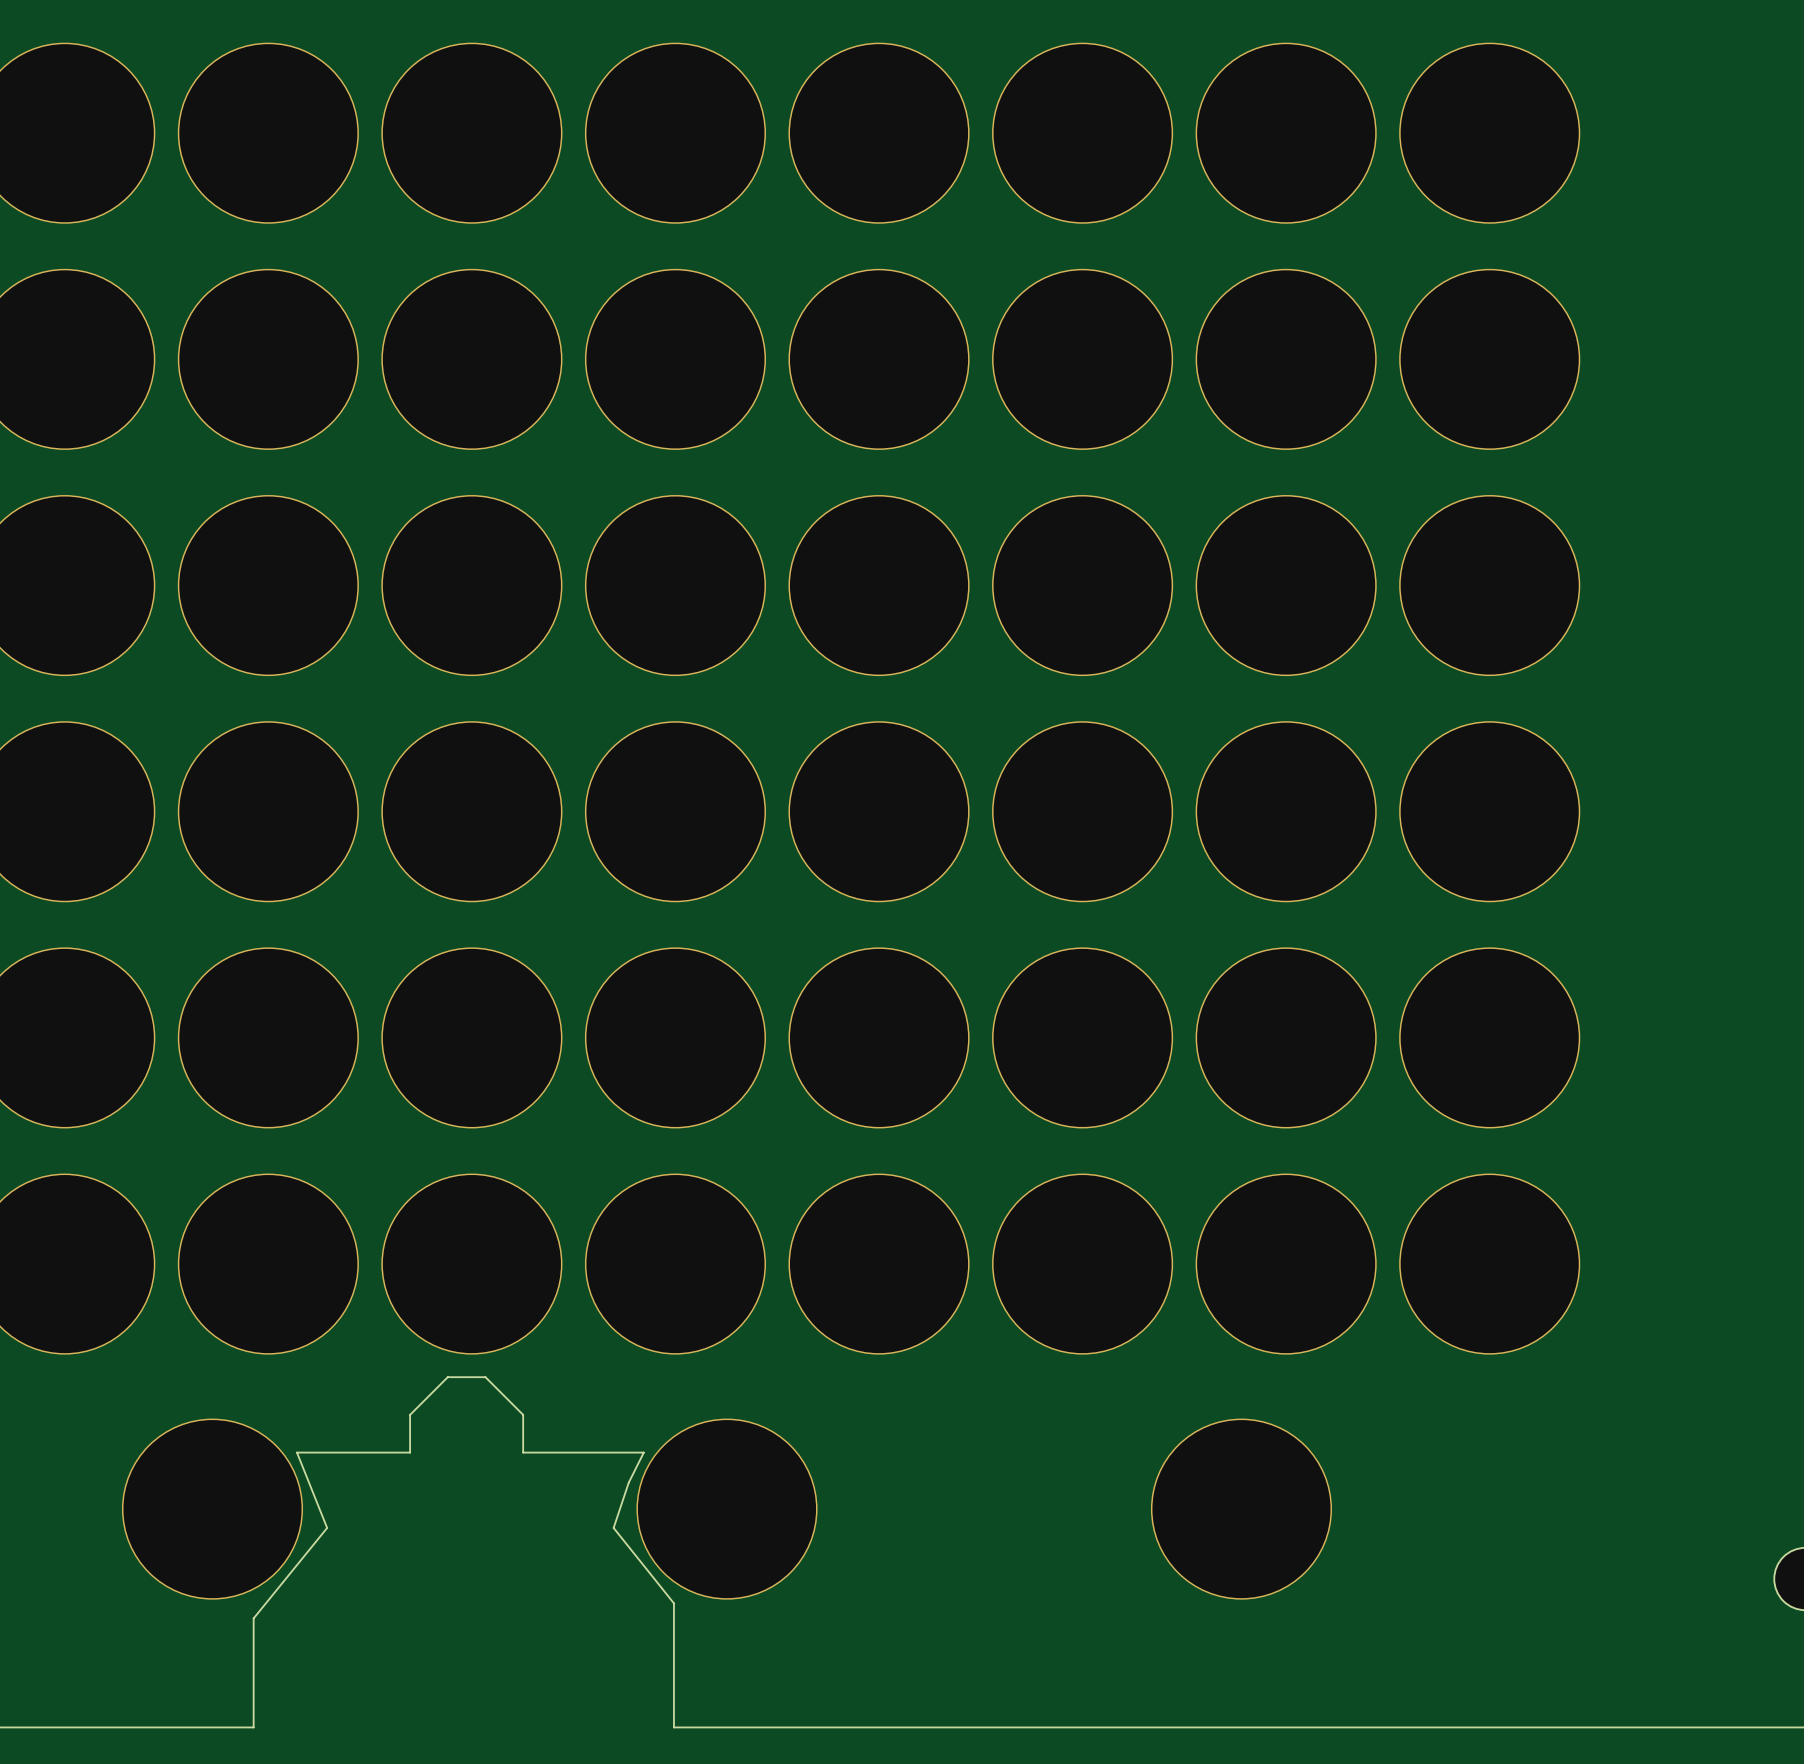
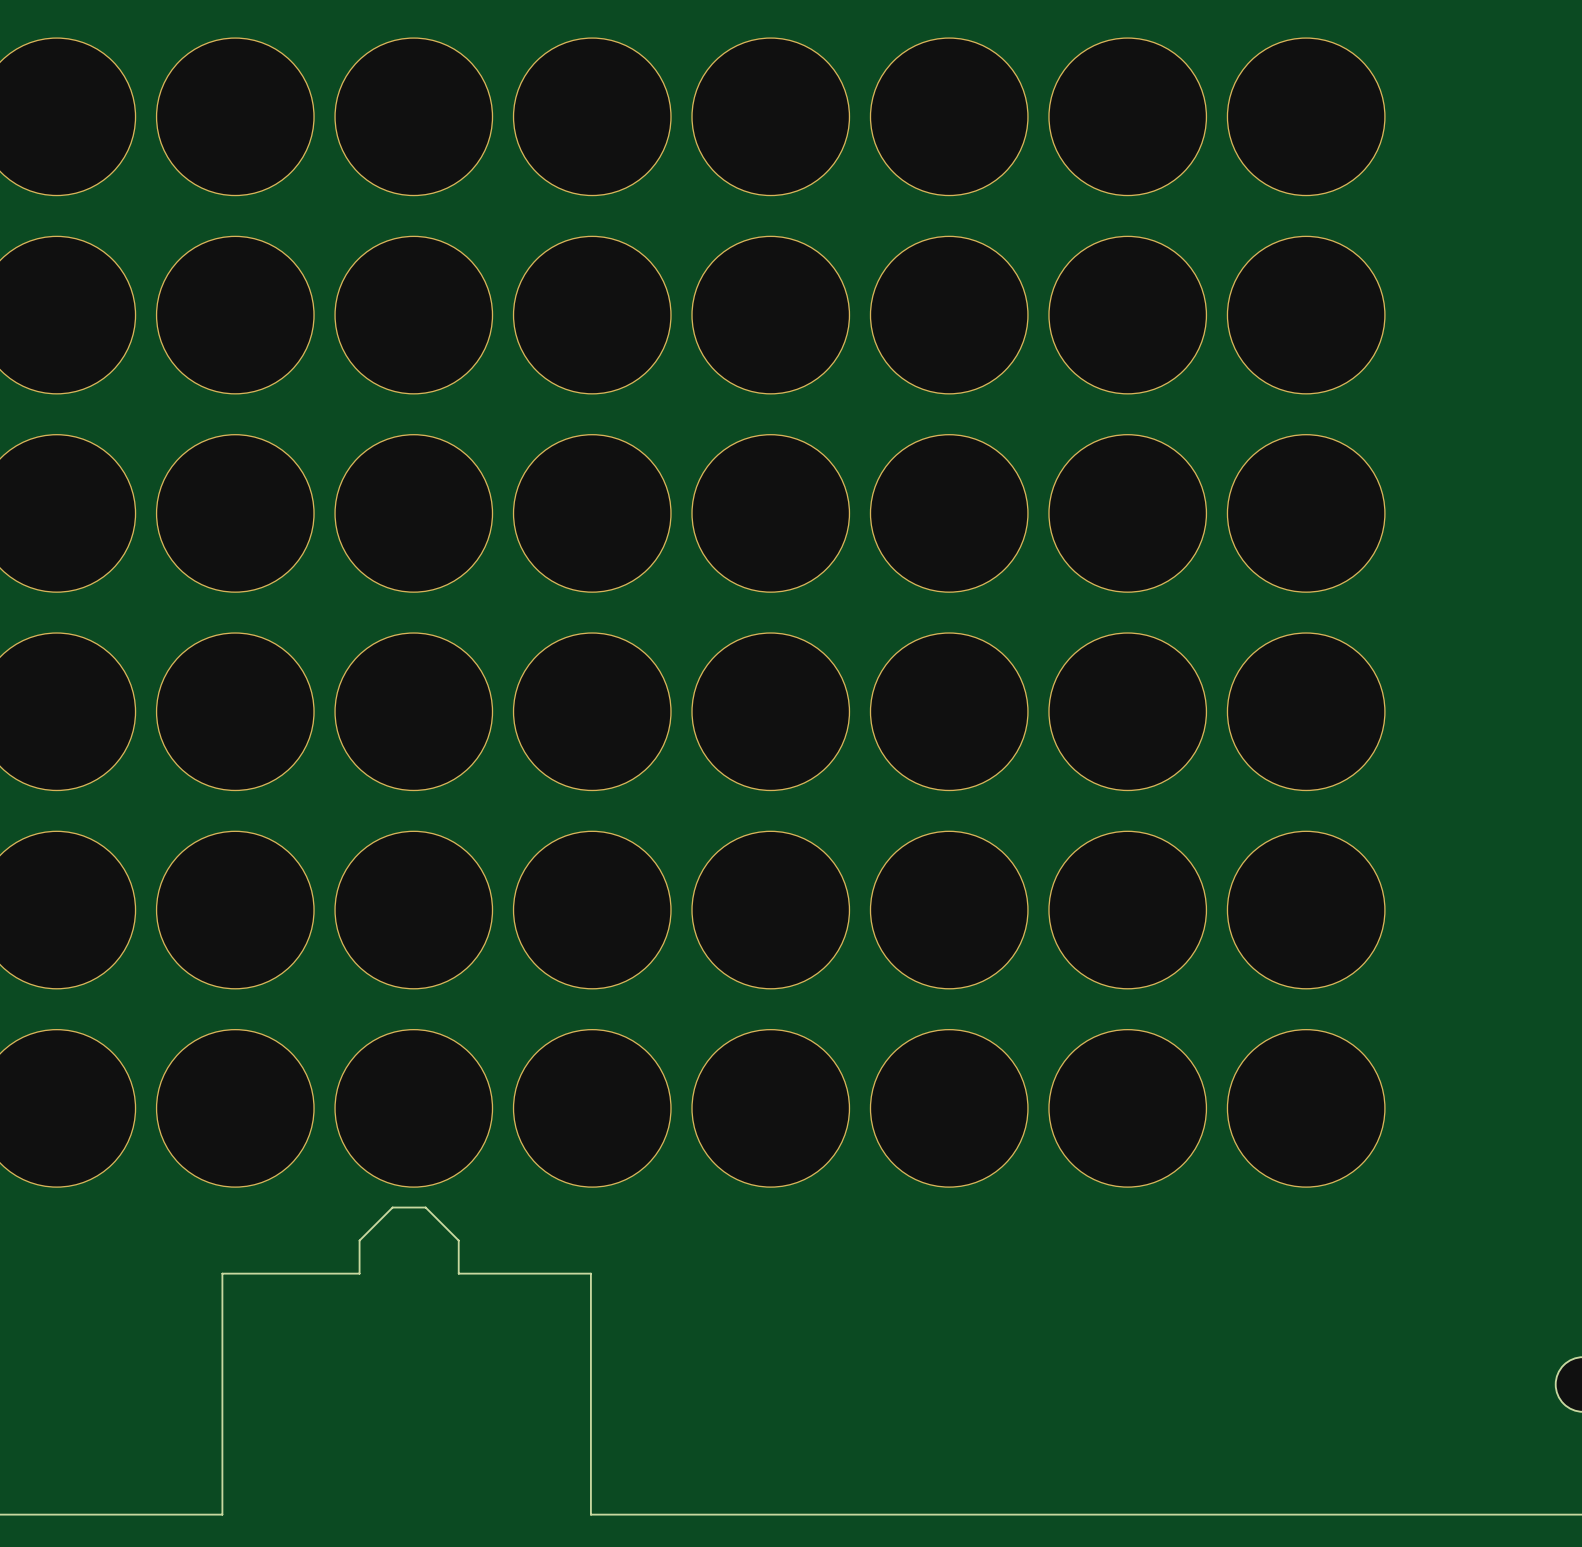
board edge: (296, 1452) (327, 1527) (253, 1618) -> (260, 1273) (222, 1273) (222, 1419)
board edge: (643, 1452) (628, 1482) (613, 1527) (673, 1603) -> (564, 1273) (590, 1273) (590, 1405)
part: (212, 1509) -> none
part: (726, 1509) -> none
part: (1241, 1509) -> none

